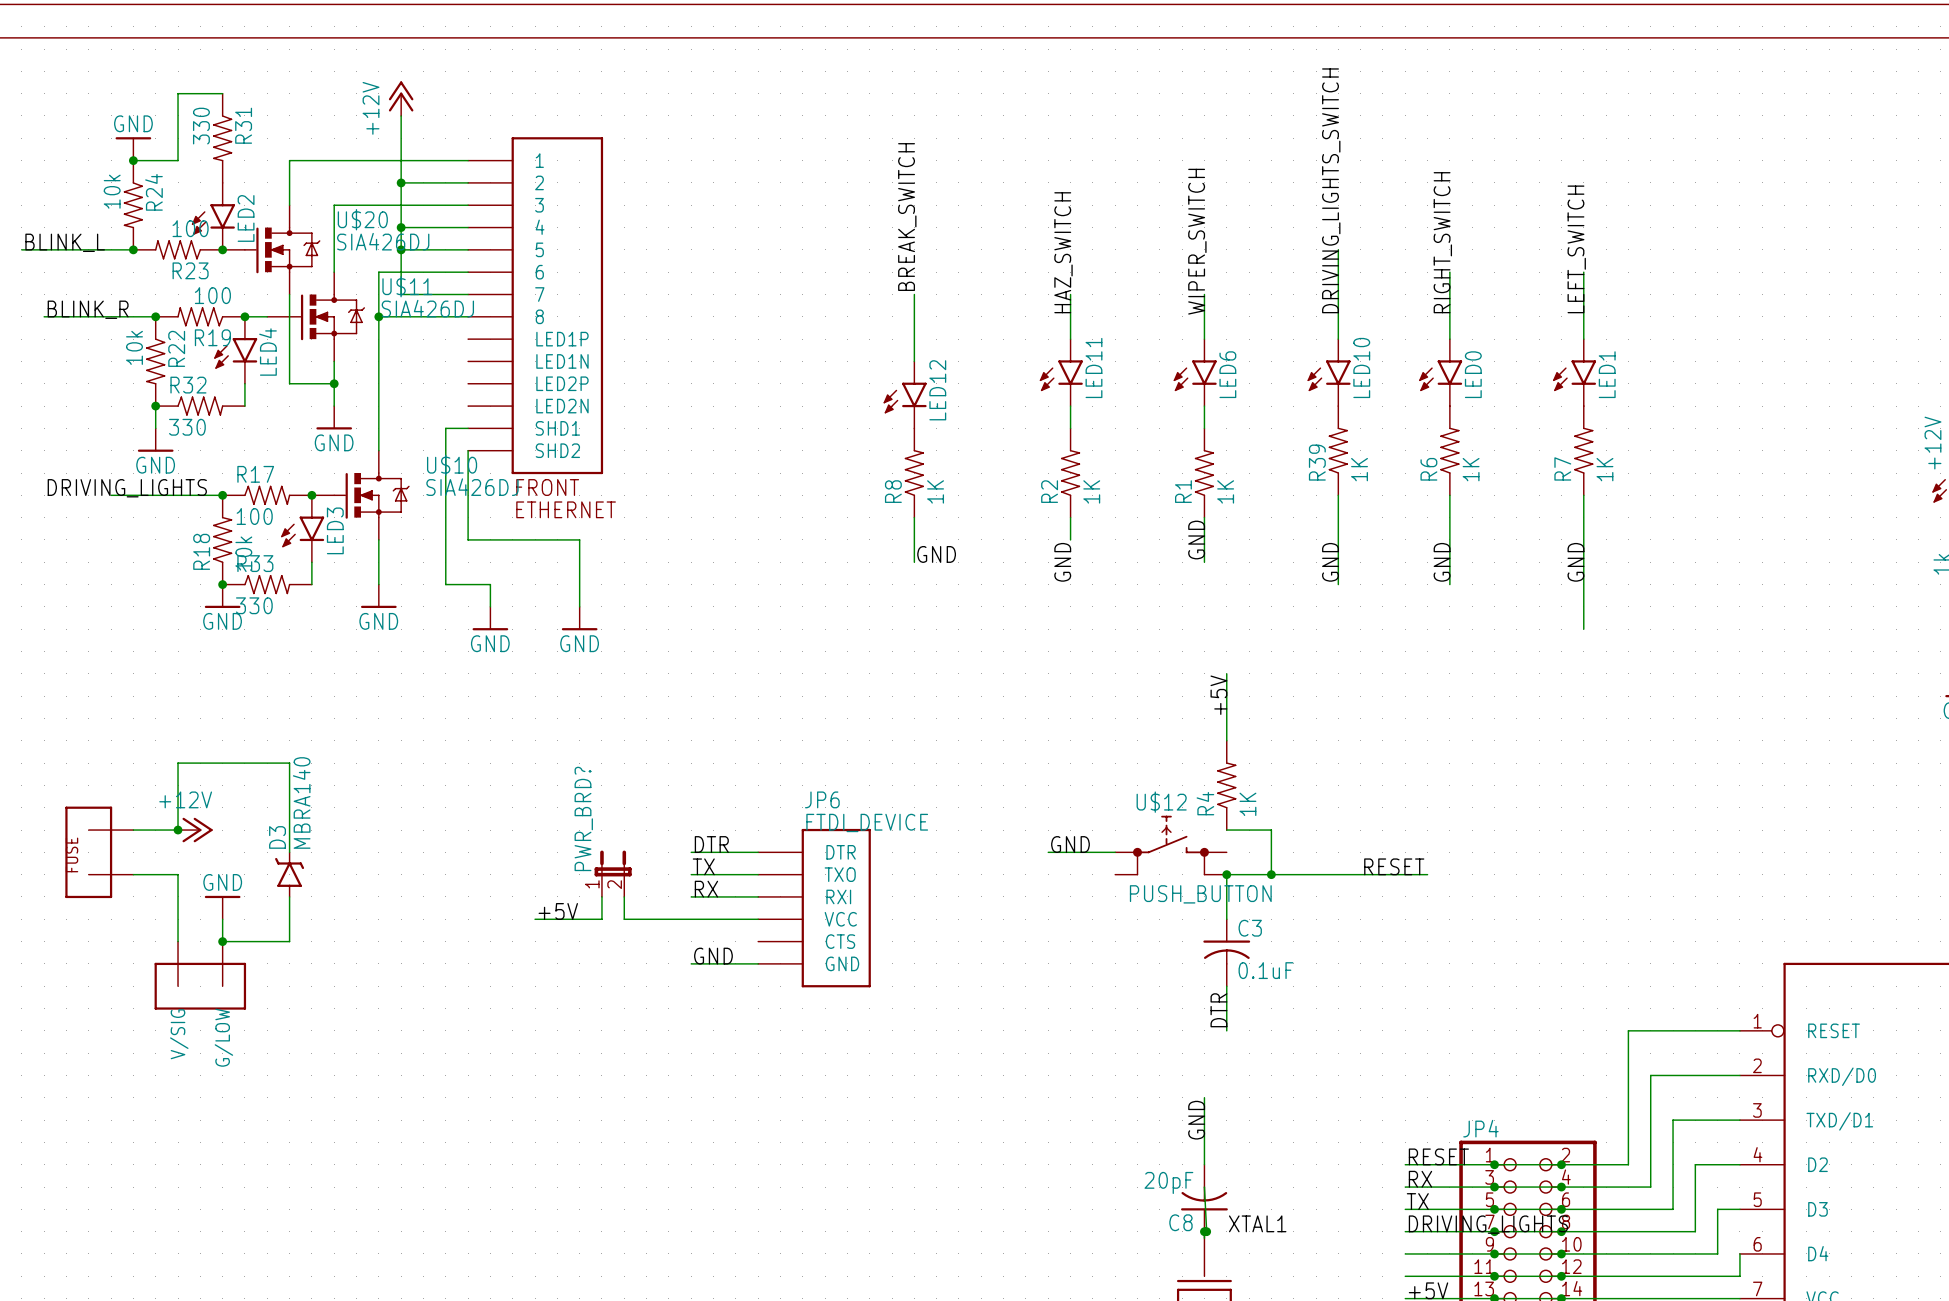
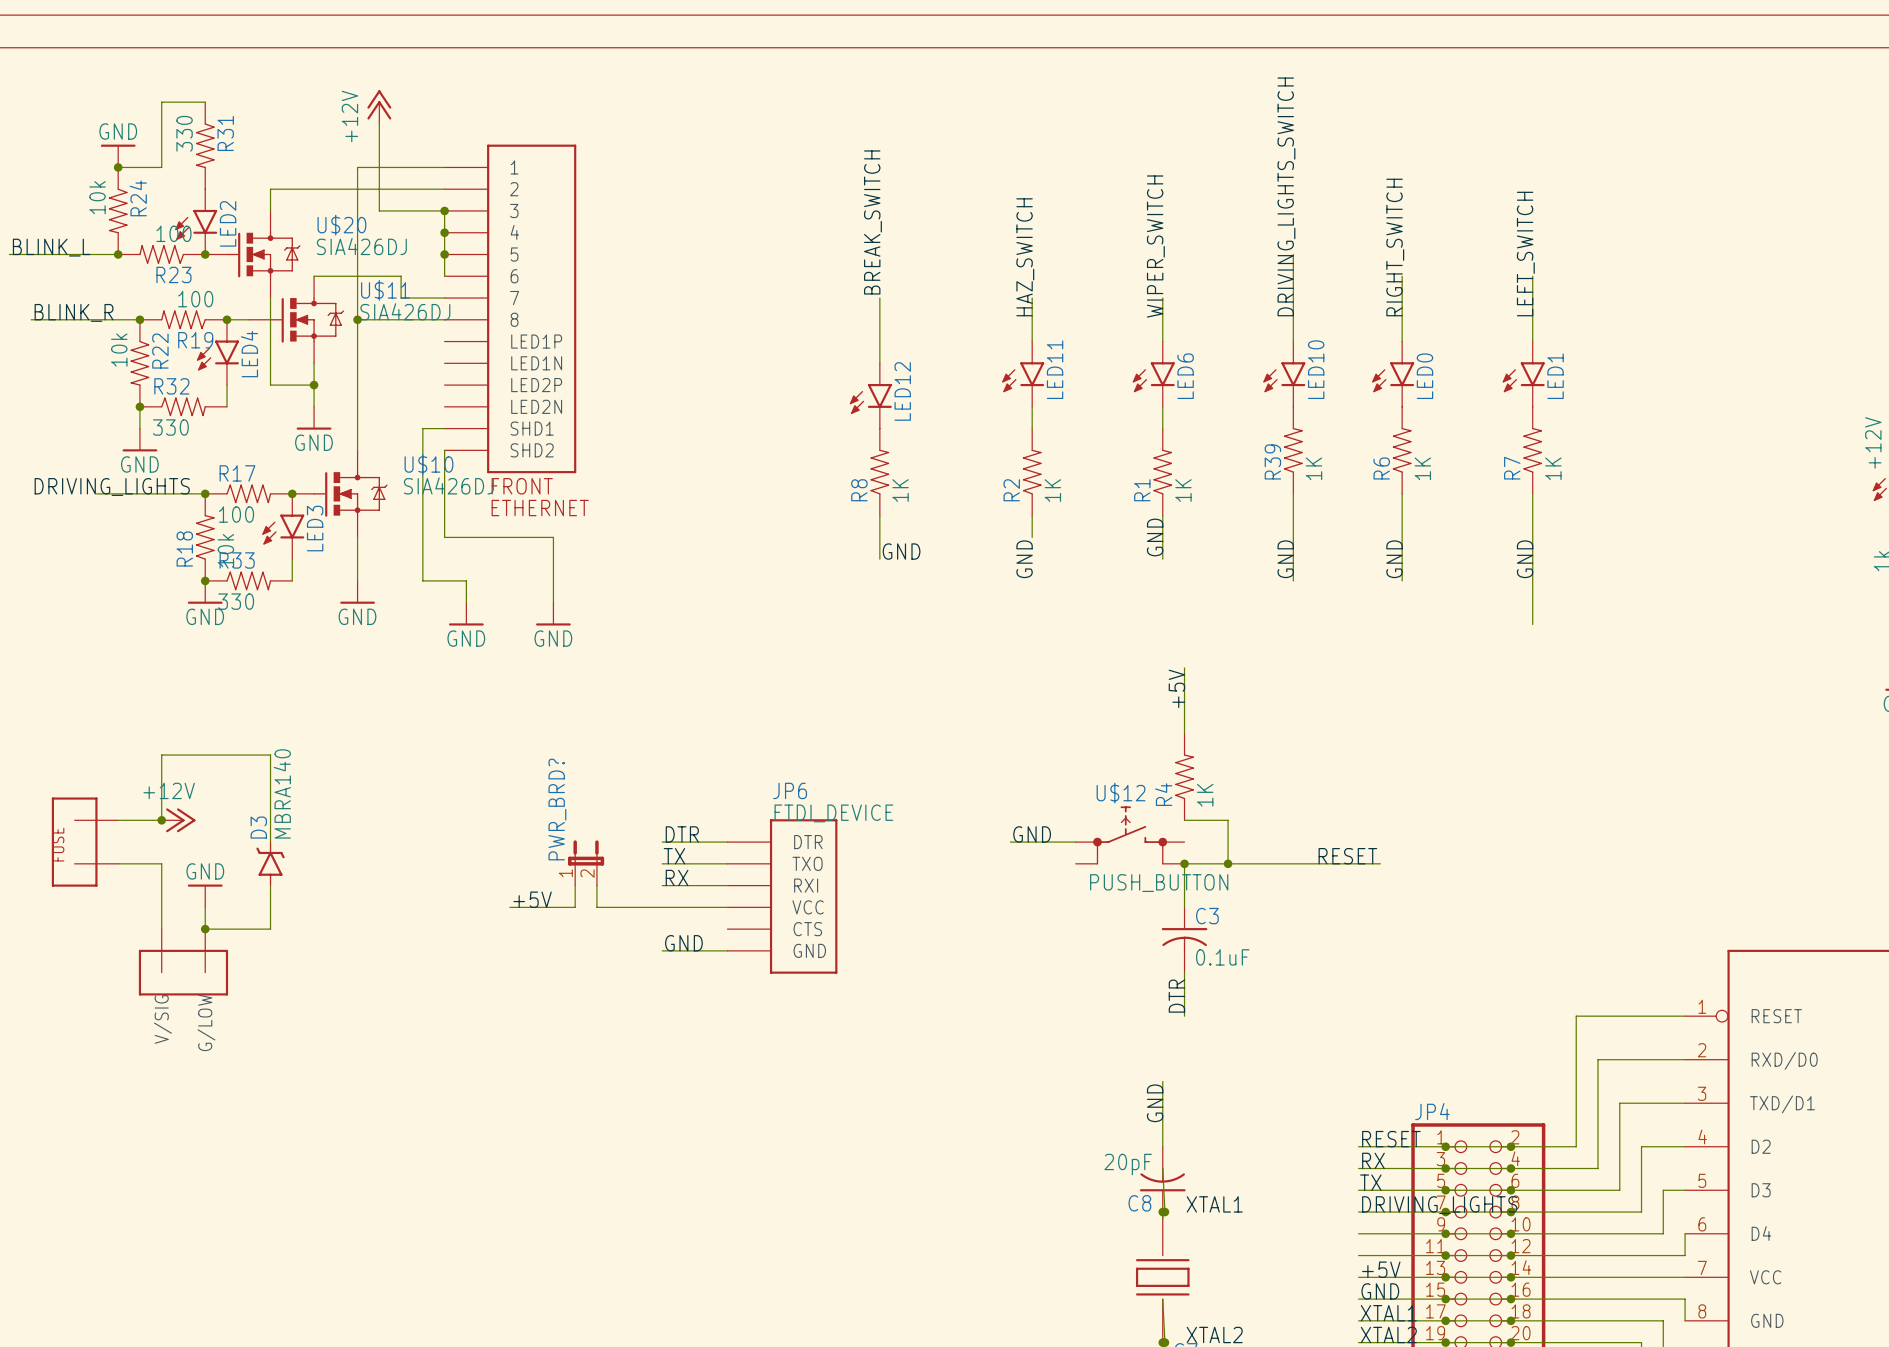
wire: (378, 160) (289, 160) (289, 182) -> (379, 189) (270, 189)
junction: (401, 182) -> none
wire: none -> (444, 210) (444, 276)
junction: none -> (444, 210)
wire: (401, 227) (468, 227) -> none
junction: (401, 227) -> none
junction: none -> (444, 232)
wire: (401, 249) (468, 249) -> none
junction: (401, 249) -> none
junction: none -> (444, 254)
wire: (334, 272) (334, 205) (401, 205) (401, 294) (423, 294) -> (314, 276) (357, 276) (357, 167)
wire: (423, 272) (468, 272) -> (401, 276) (401, 298)

